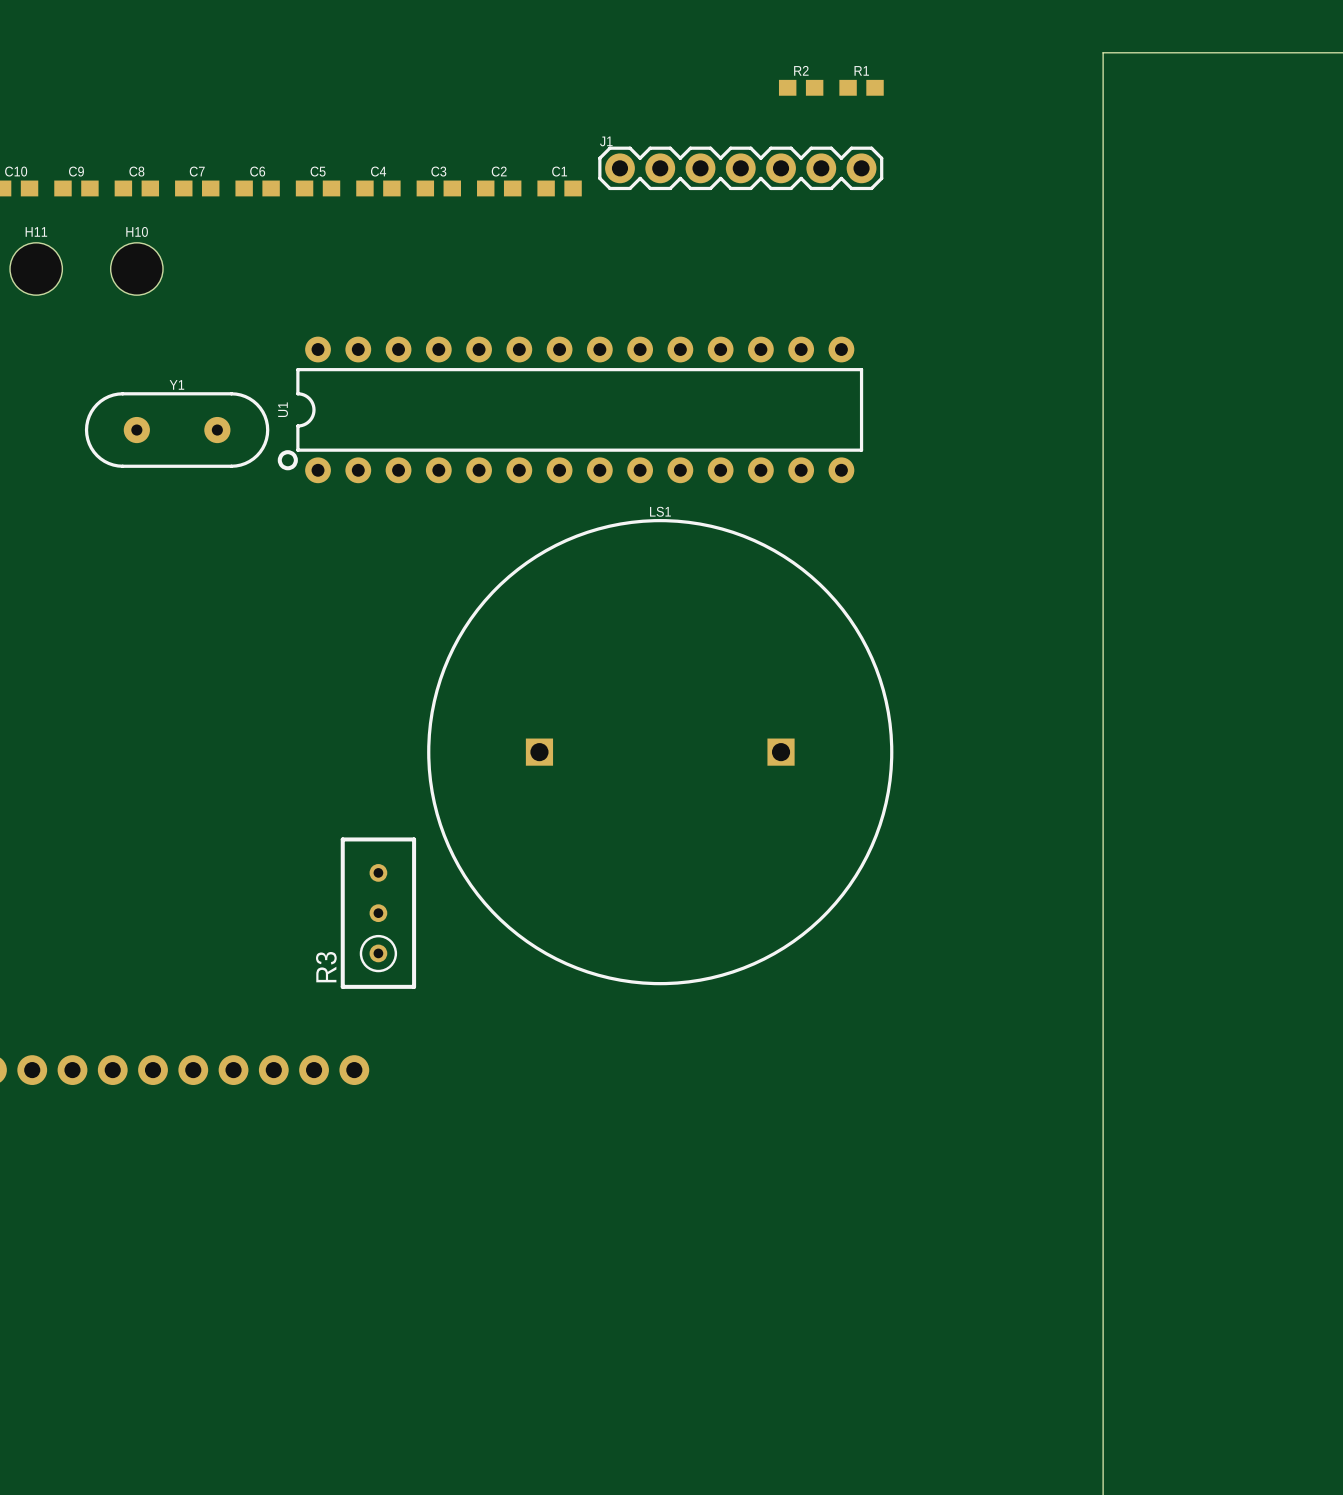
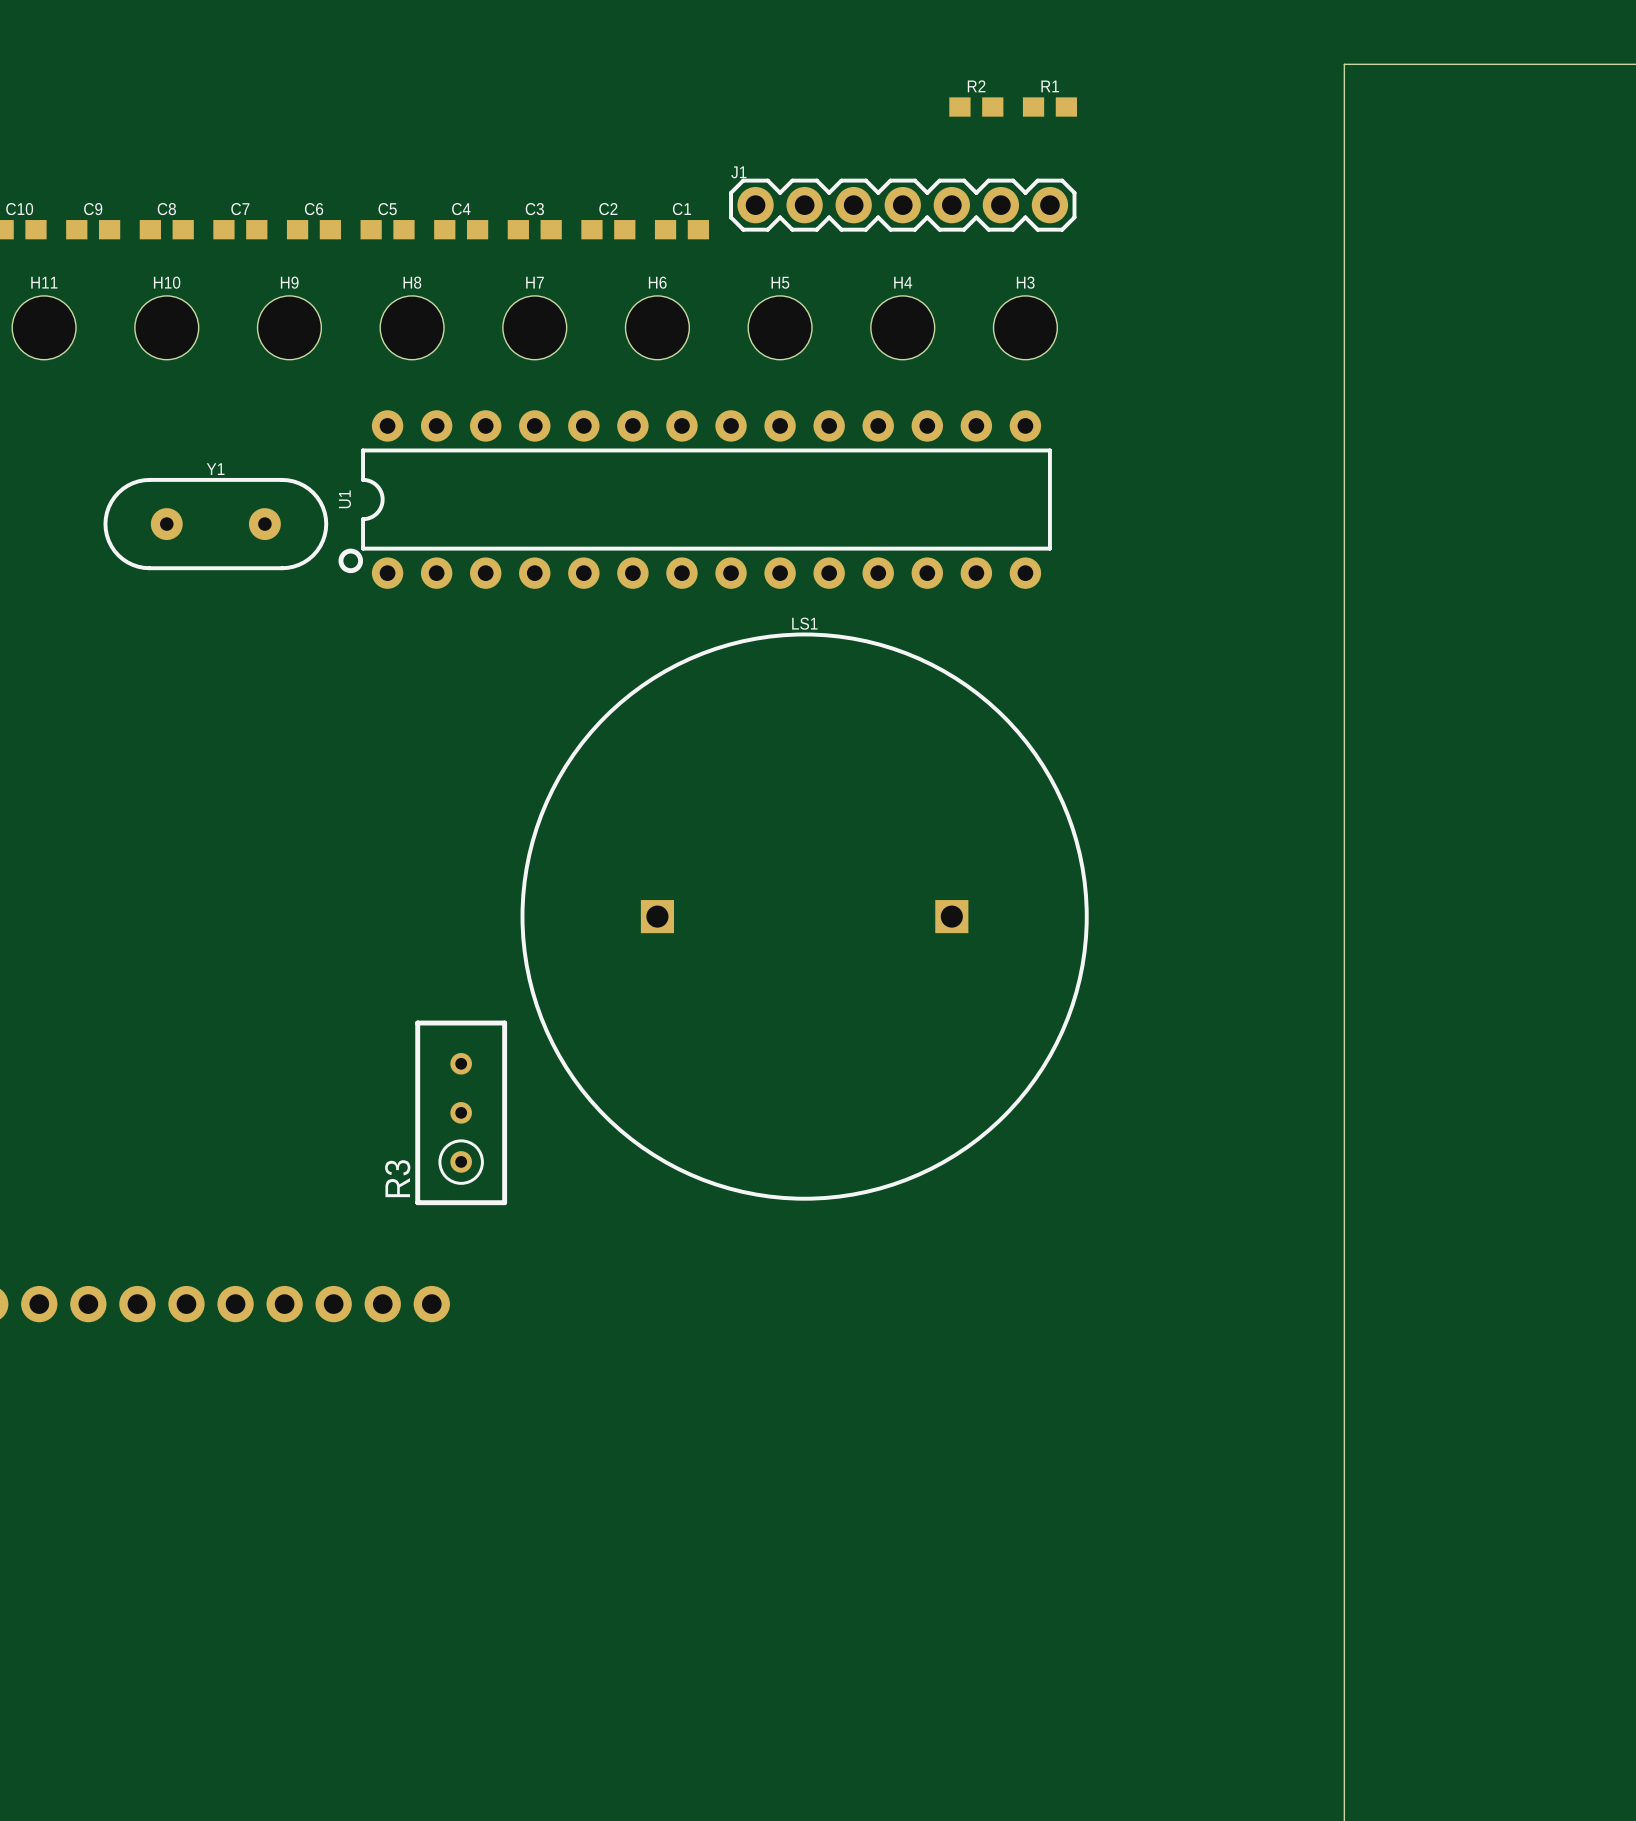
H9: none -> (289, 327)
H8: none -> (412, 327)
H7: none -> (534, 327)
H6: none -> (657, 327)
H5: none -> (780, 327)
H4: none -> (902, 327)
H3: none -> (1025, 327)

